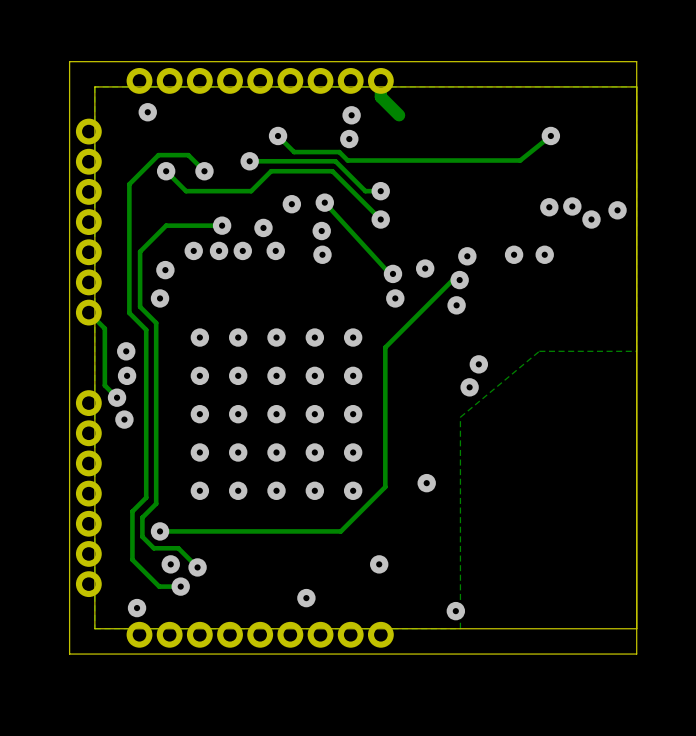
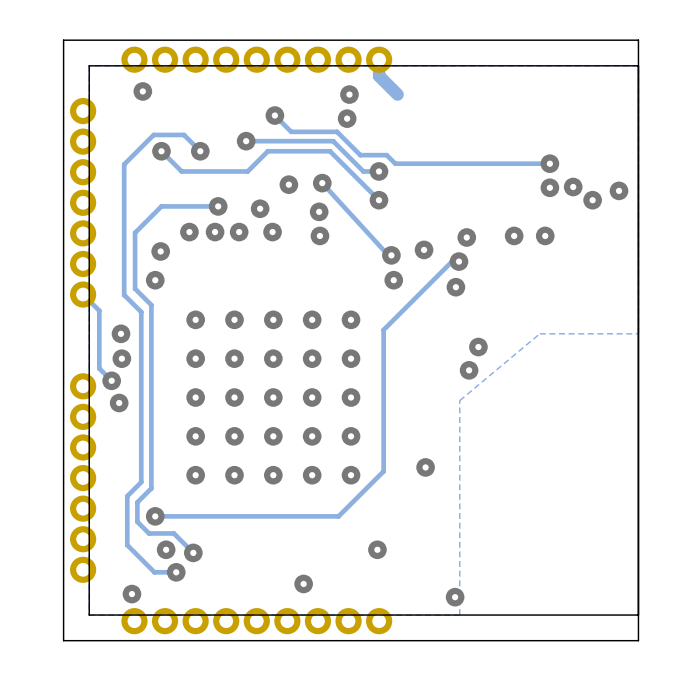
track: (544, 135) (550, 135) (520, 160) (347, 160) -> (549, 163) (395, 163) (386, 155) (360, 155) (345, 140)
via position: (550, 135) -> (549, 163)

